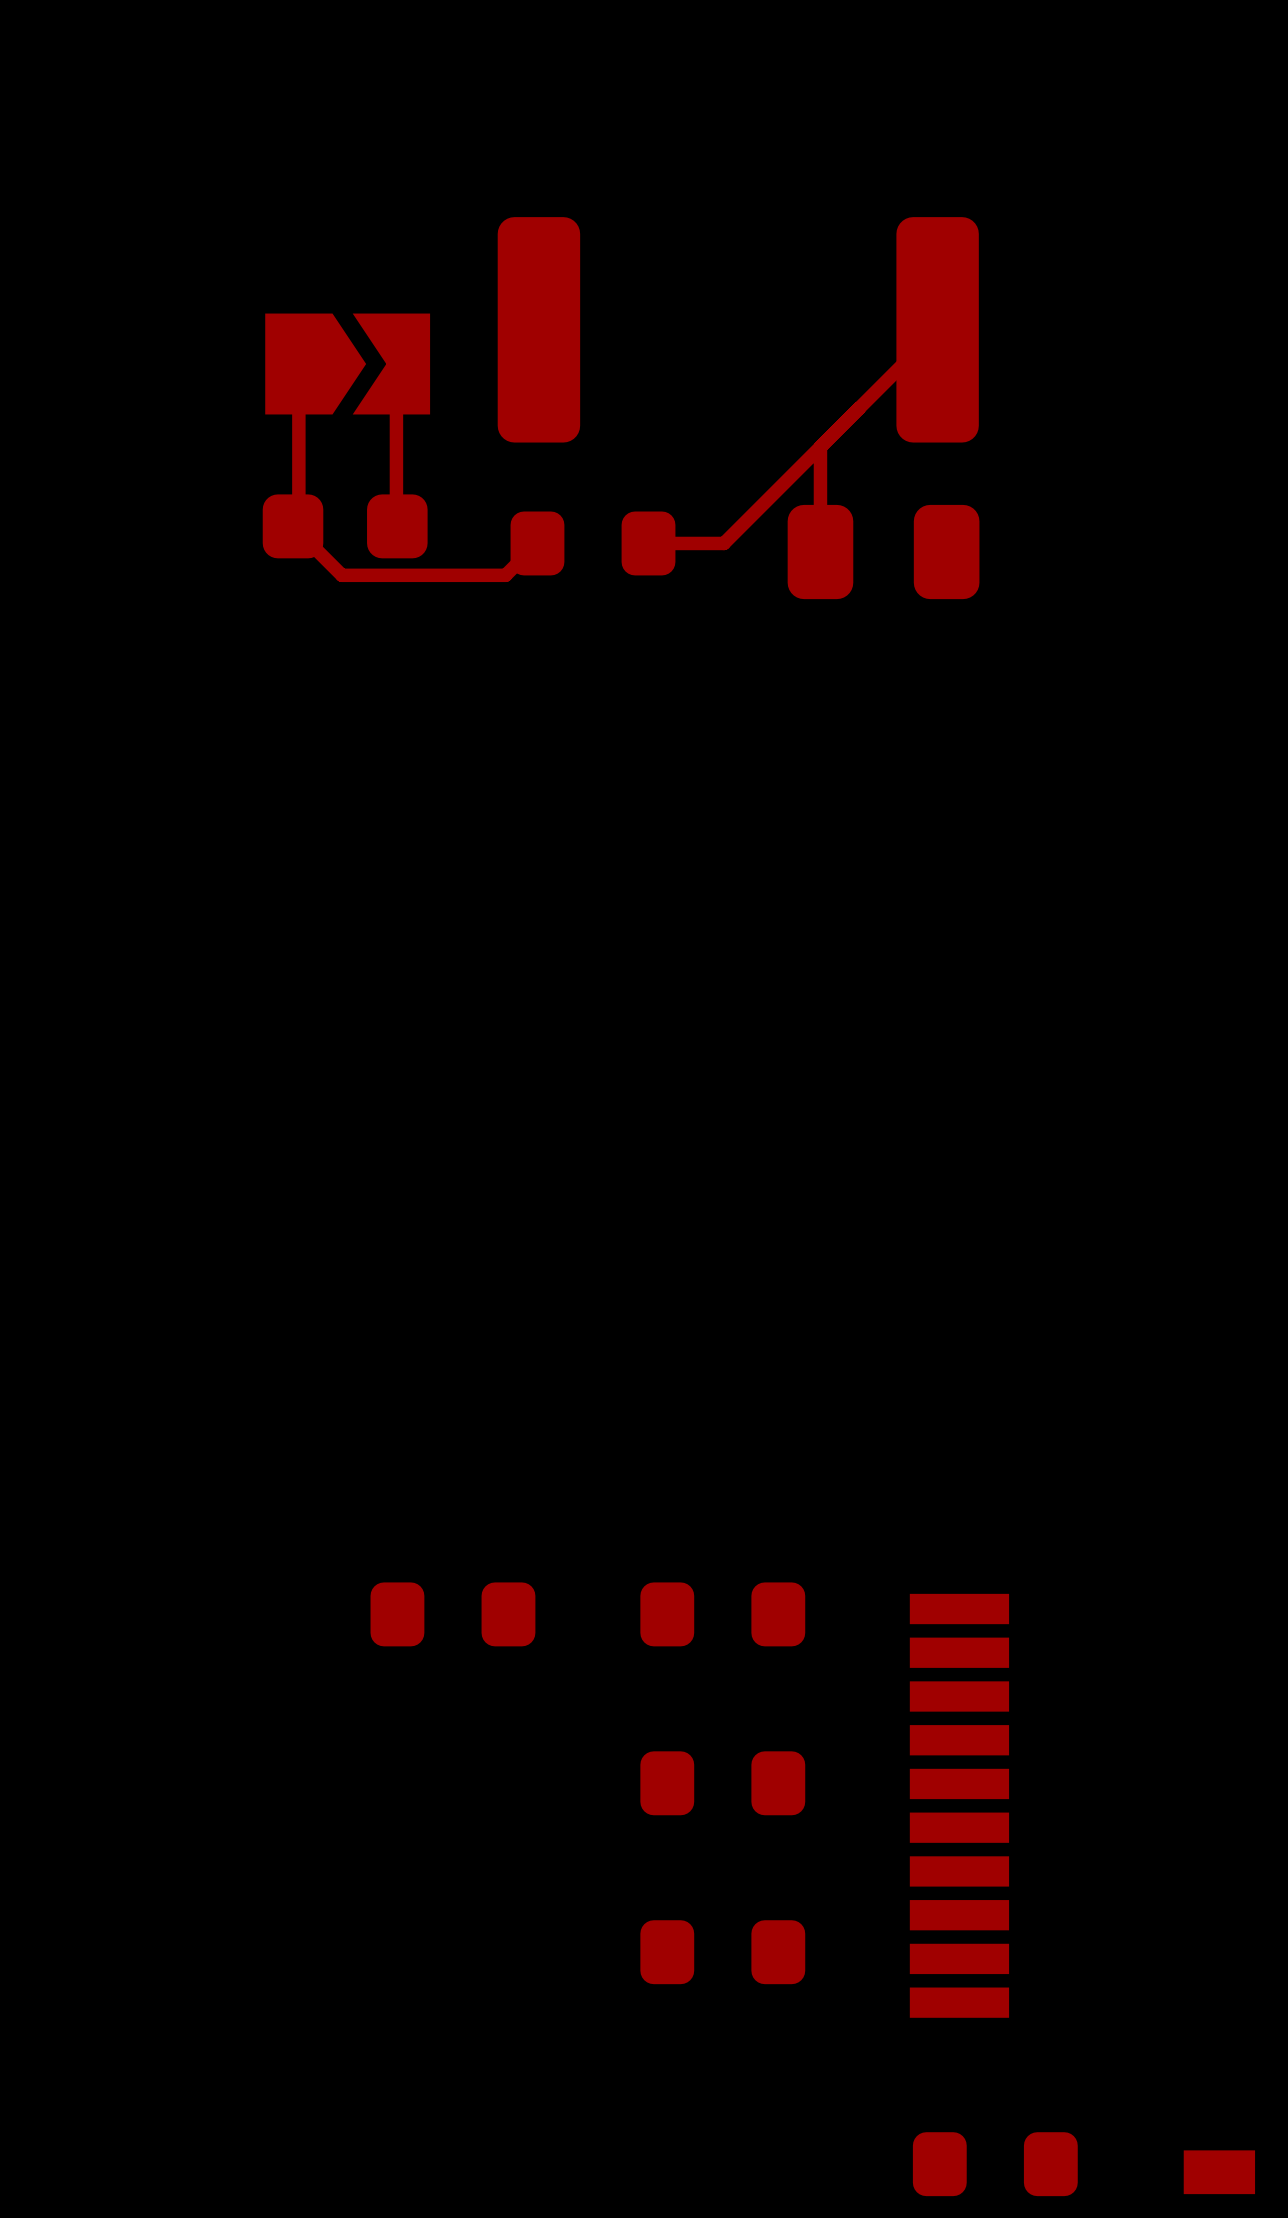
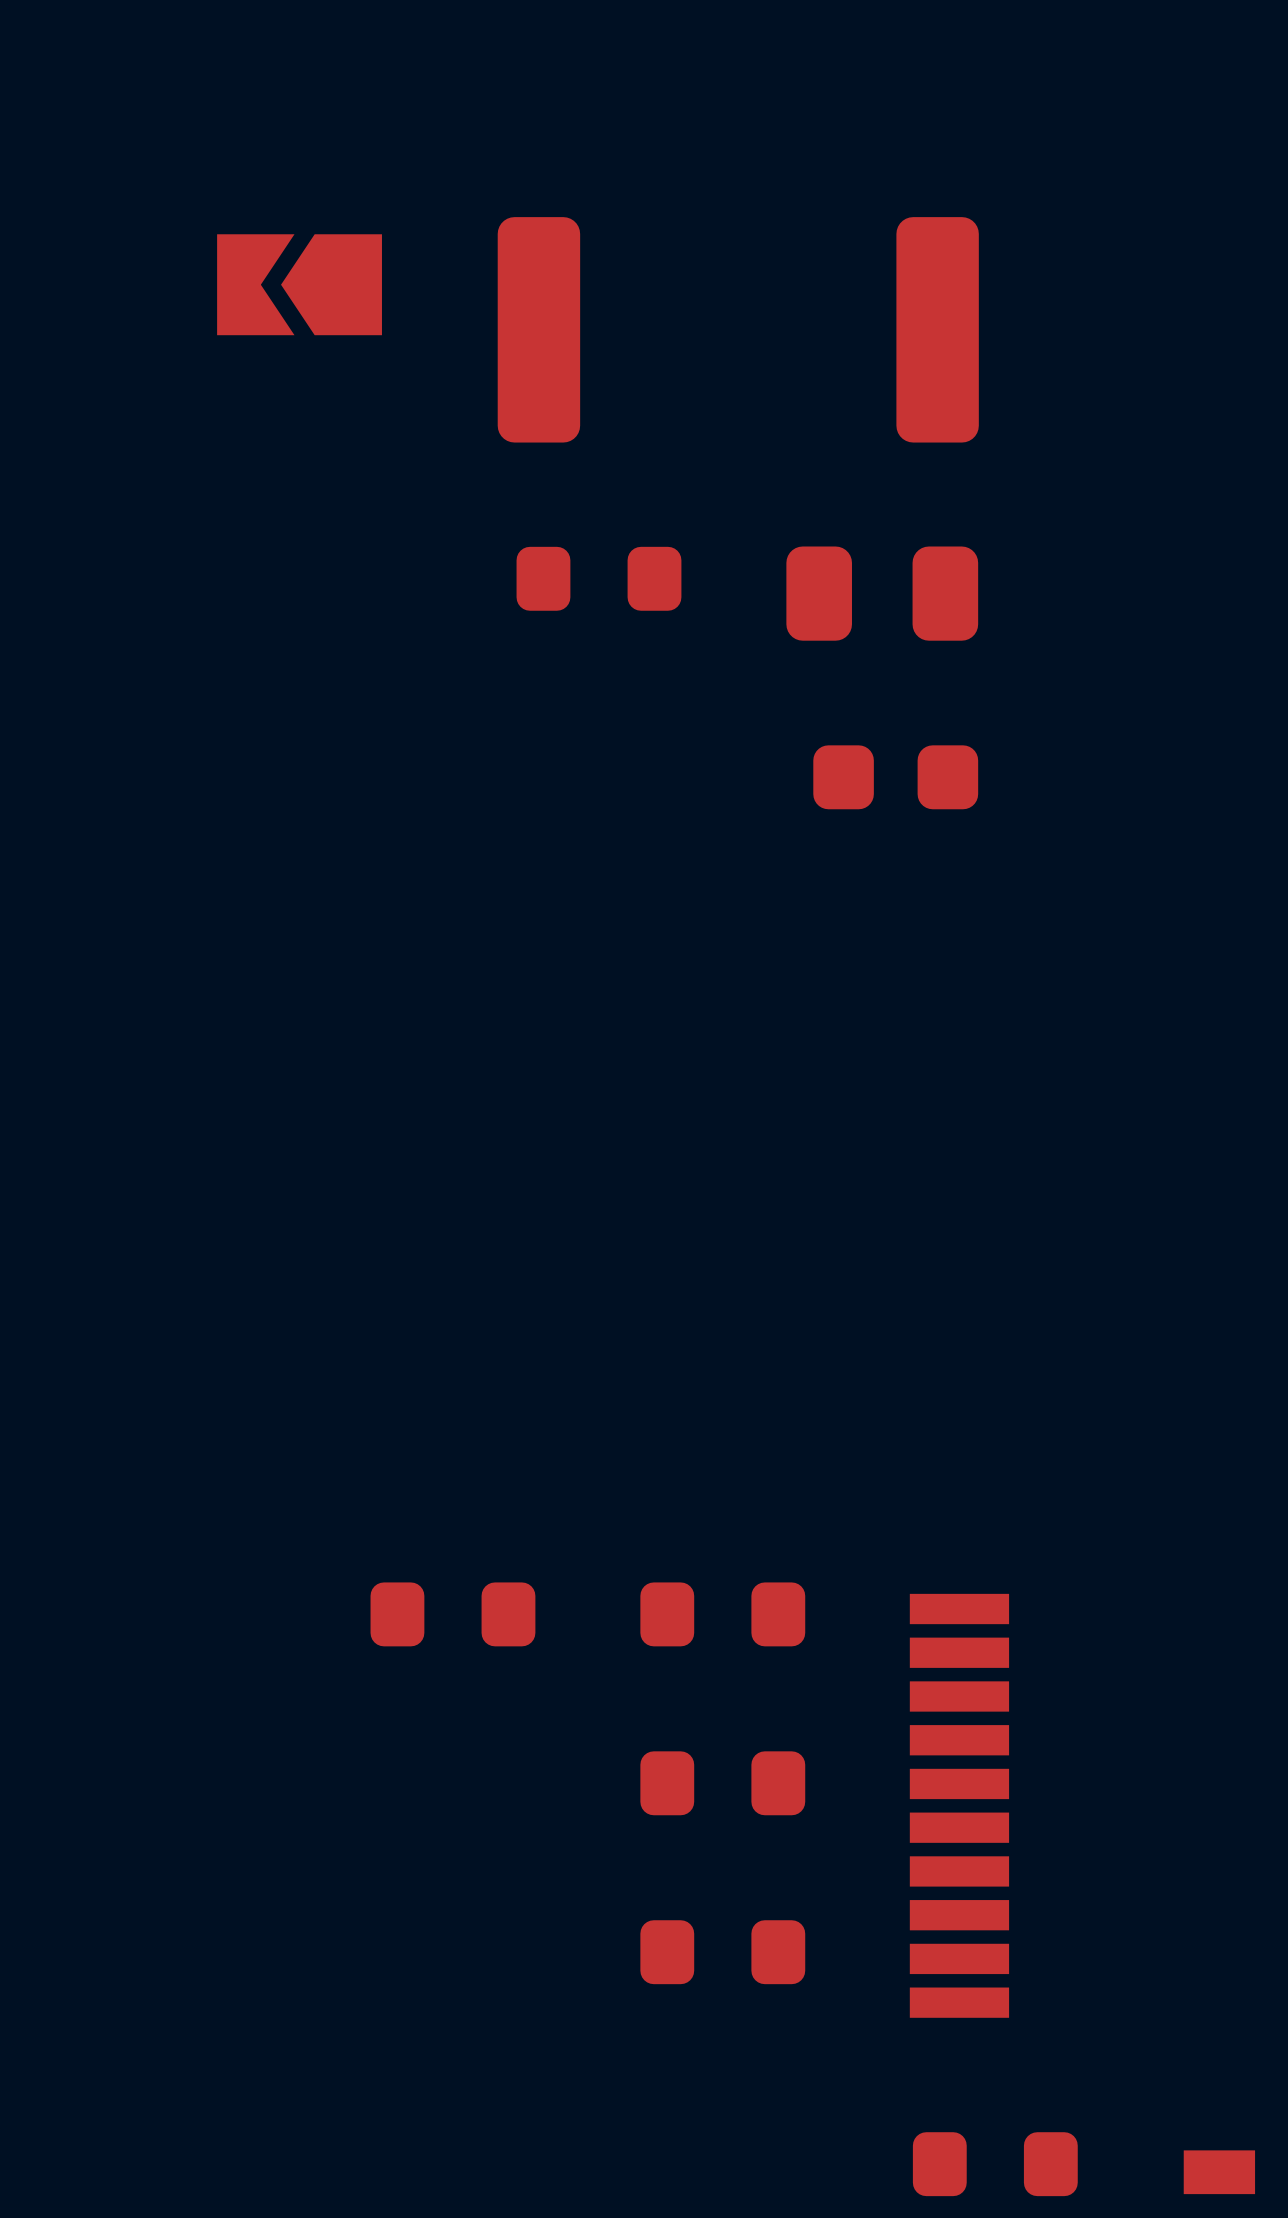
top track: (937, 329) (723, 543) (648, 543) -> none
top track: (298, 364) (298, 520) (293, 526) (341, 575) (505, 575) (537, 543) -> none
part rotation: 0° (347, 364) -> 180° (299, 284)
top track: (396, 364) (396, 525) -> none
top track: (820, 446) (820, 552) -> none
part position: (345, 526) -> (895, 777)
part position: (592, 543) -> (598, 578)
part position: (883, 552) -> (882, 593)

